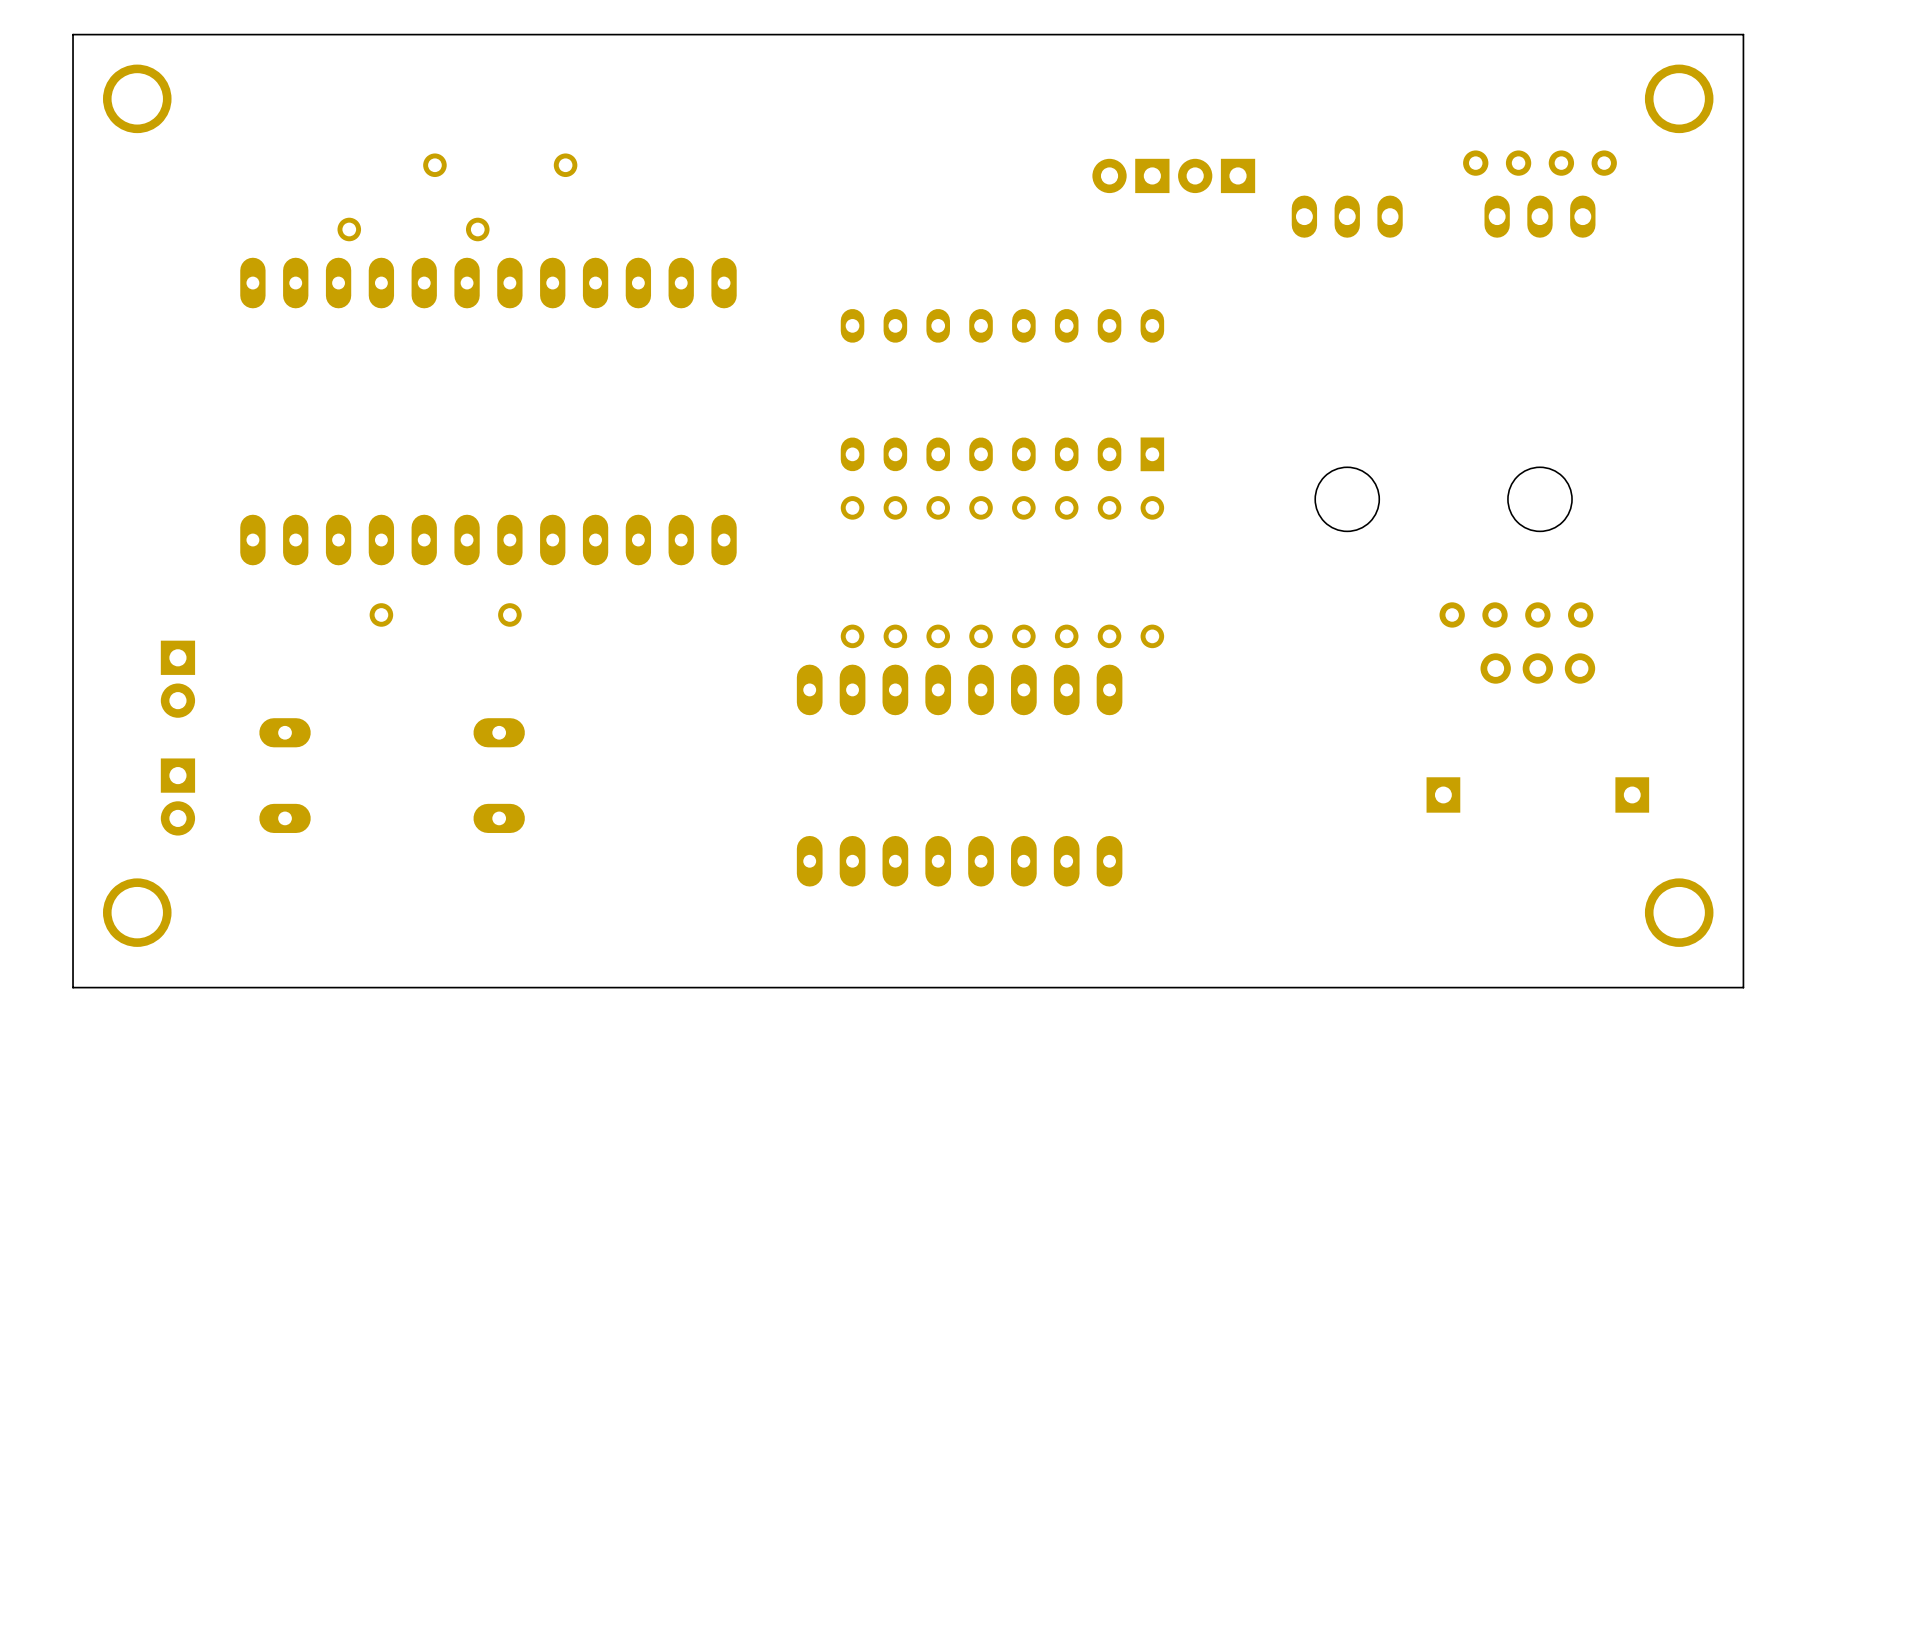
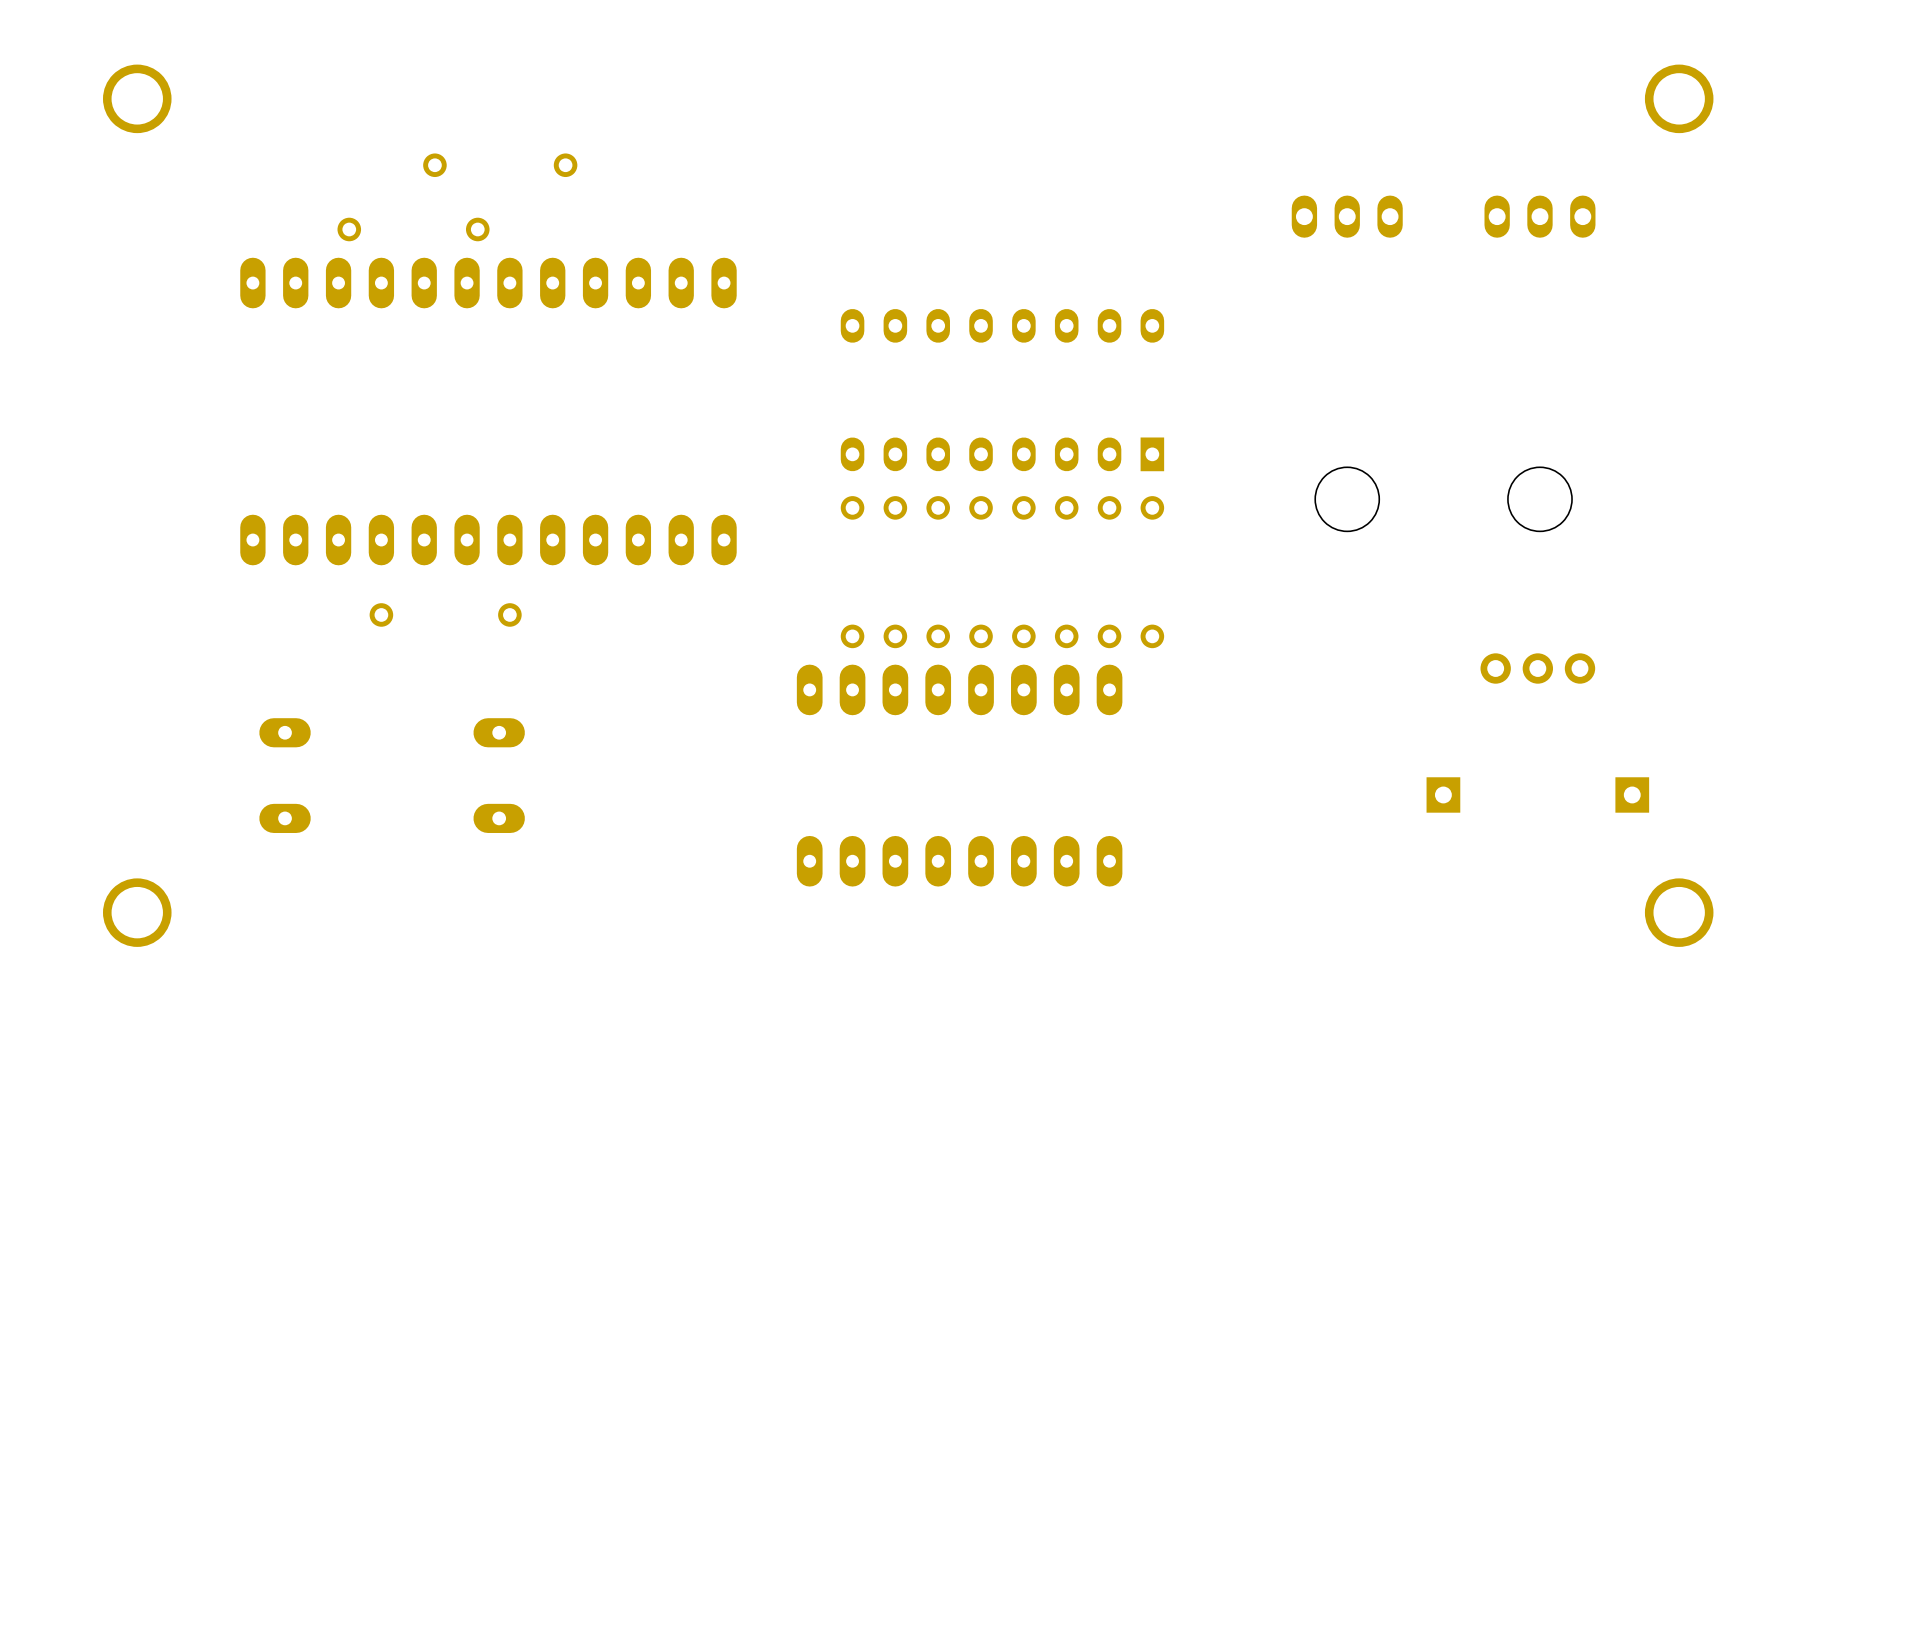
board edge: (1743, 34) (73, 34) (73, 987) (1743, 987) (1743, 34) -> none
part: (1497, 163) -> none
part: (1582, 163) -> none
part: (1130, 175) -> none
part: (1216, 175) -> none
part: (1473, 614) -> none
part: (1559, 614) -> none
part: (177, 679) -> none
part: (177, 797) -> none

